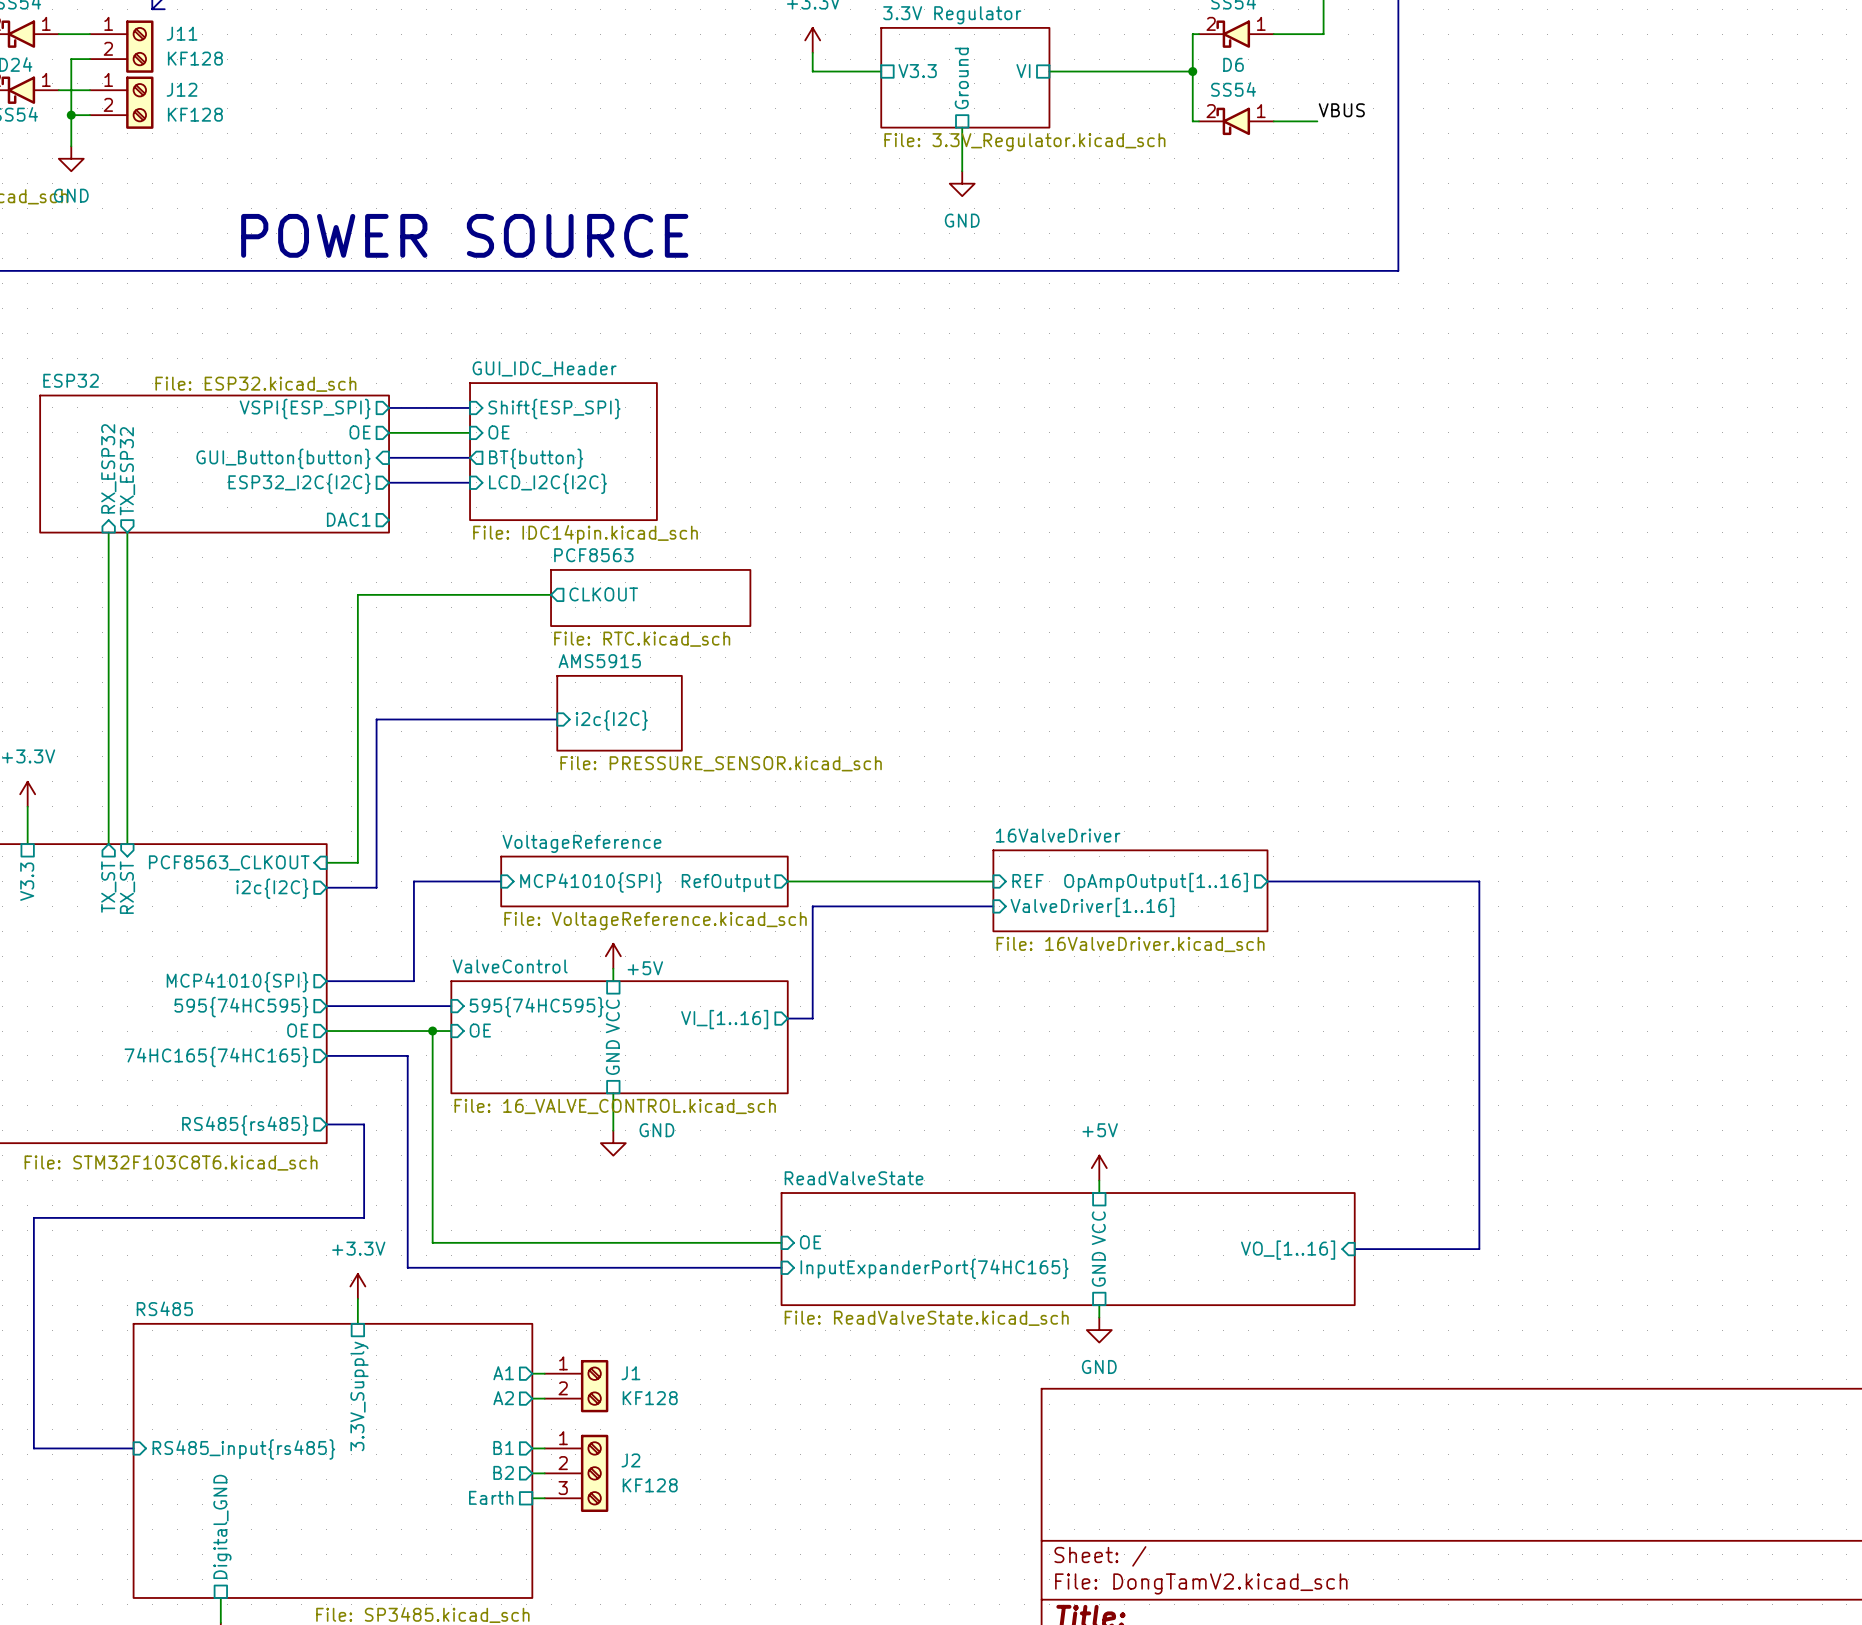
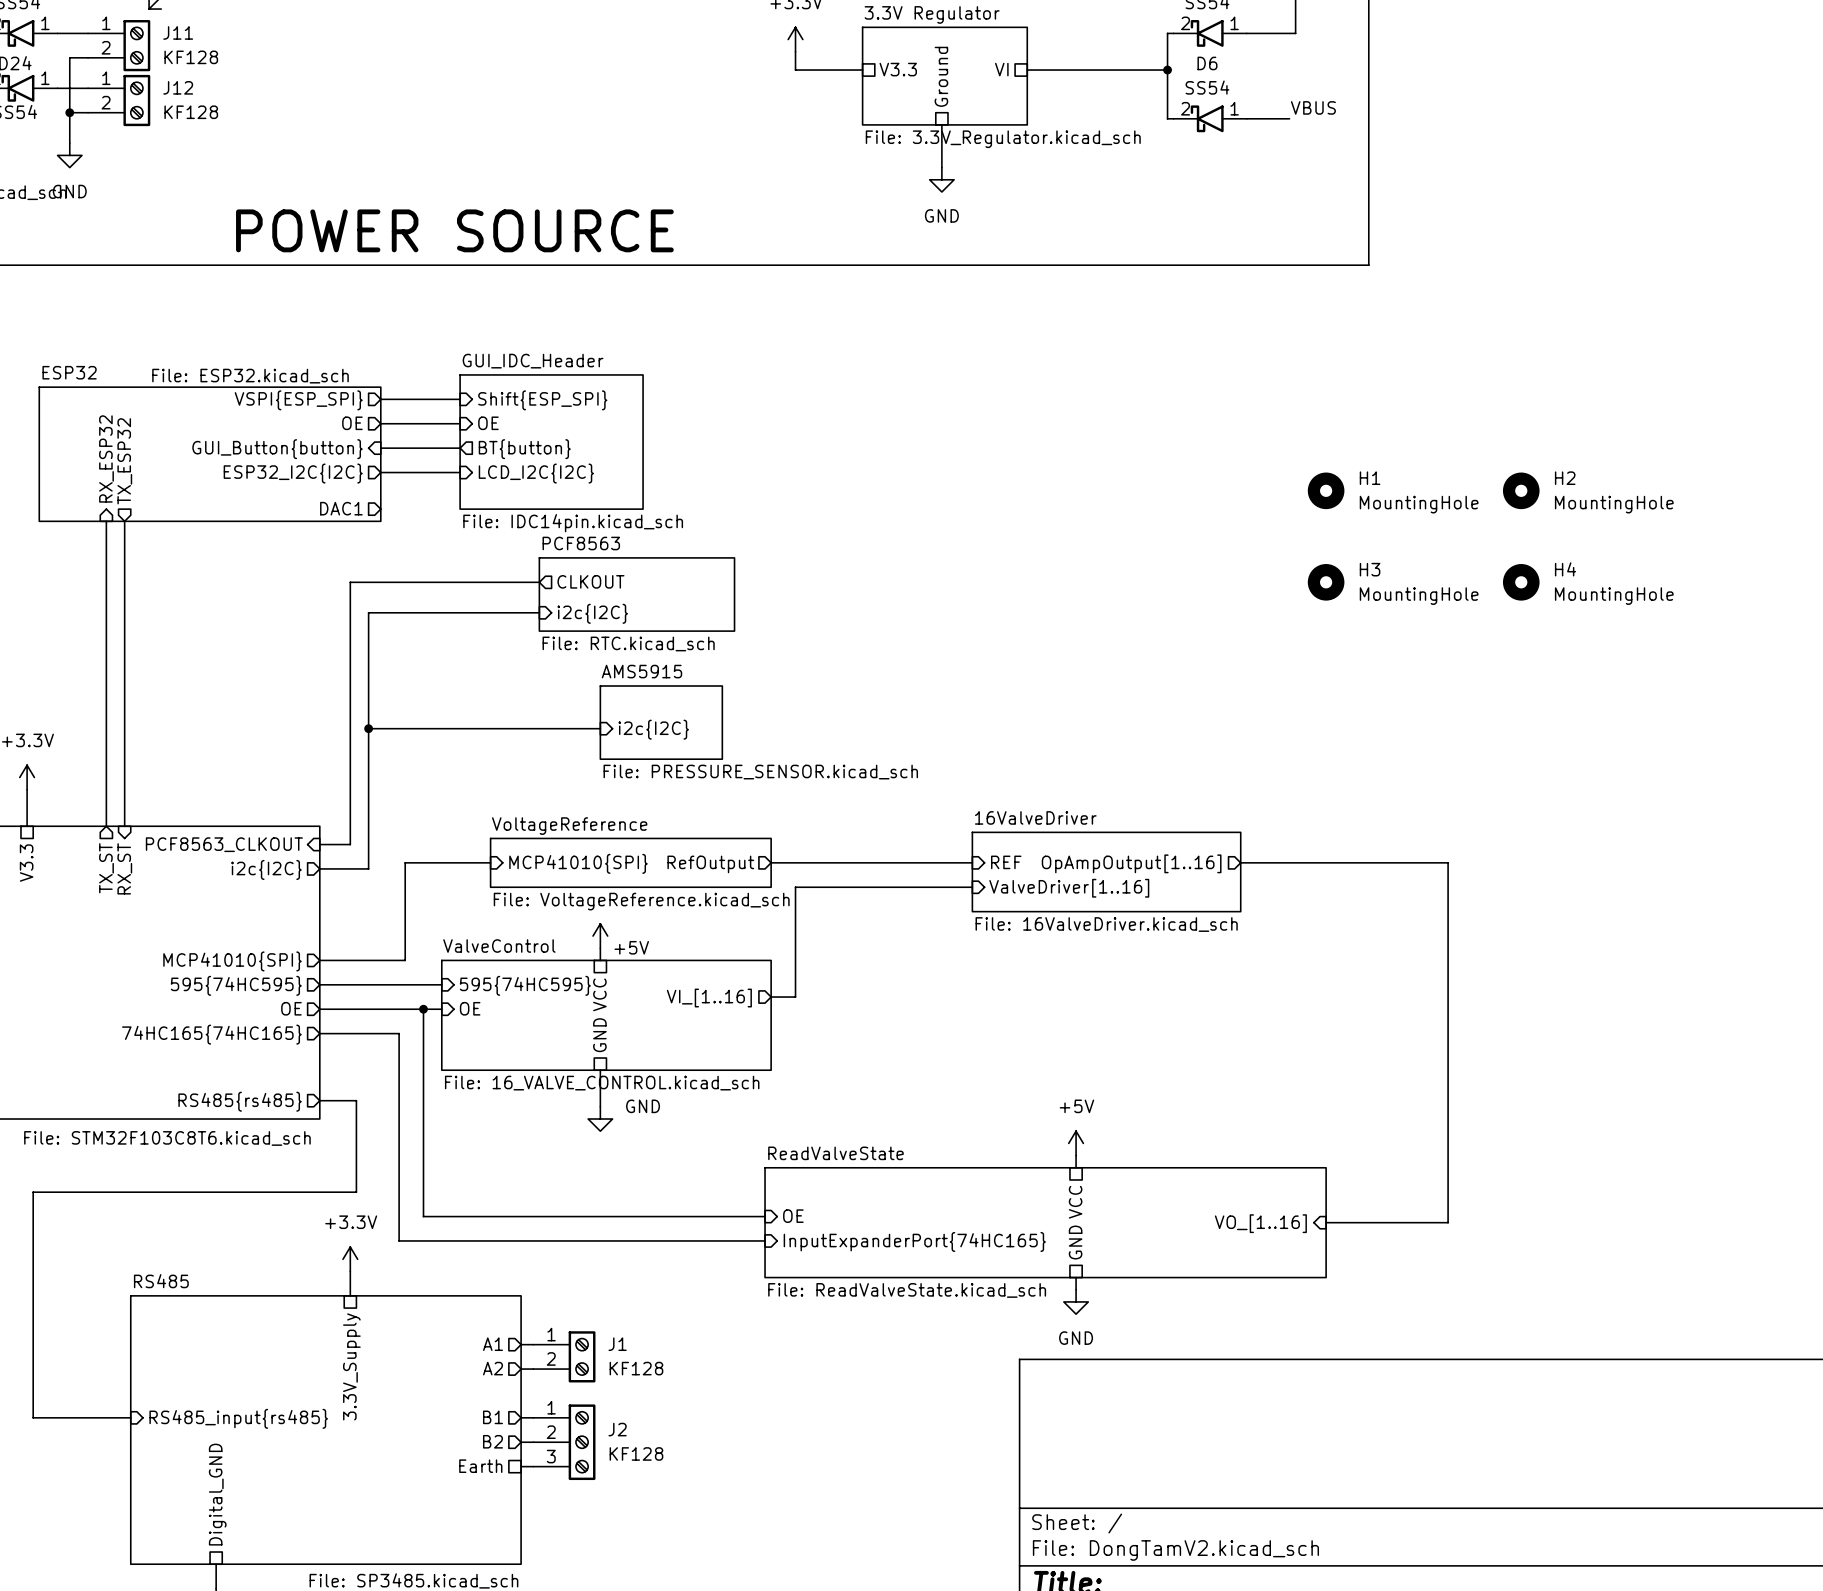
H1: none -> MountingHole (1326, 490)
H2: none -> MountingHole (1521, 490)
sheet PCF8563 shape: [550, 569, 752, 627] -> [538, 557, 736, 632]
H3: none -> MountingHole (1326, 582)
H4: none -> MountingHole (1521, 582)
sheet pin: none -> i2c{I2C} (592, 613)
sheet AMS5915 position: (619, 713) -> (661, 722)
bus: (376, 719) (557, 719) -> (368, 704) (368, 612) (539, 612)
sheet pin position: i2c{I2C} (611, 720) -> i2c{I2C} (653, 729)
bus: none -> (368, 728) (600, 728)
junction: none -> (368, 728)

